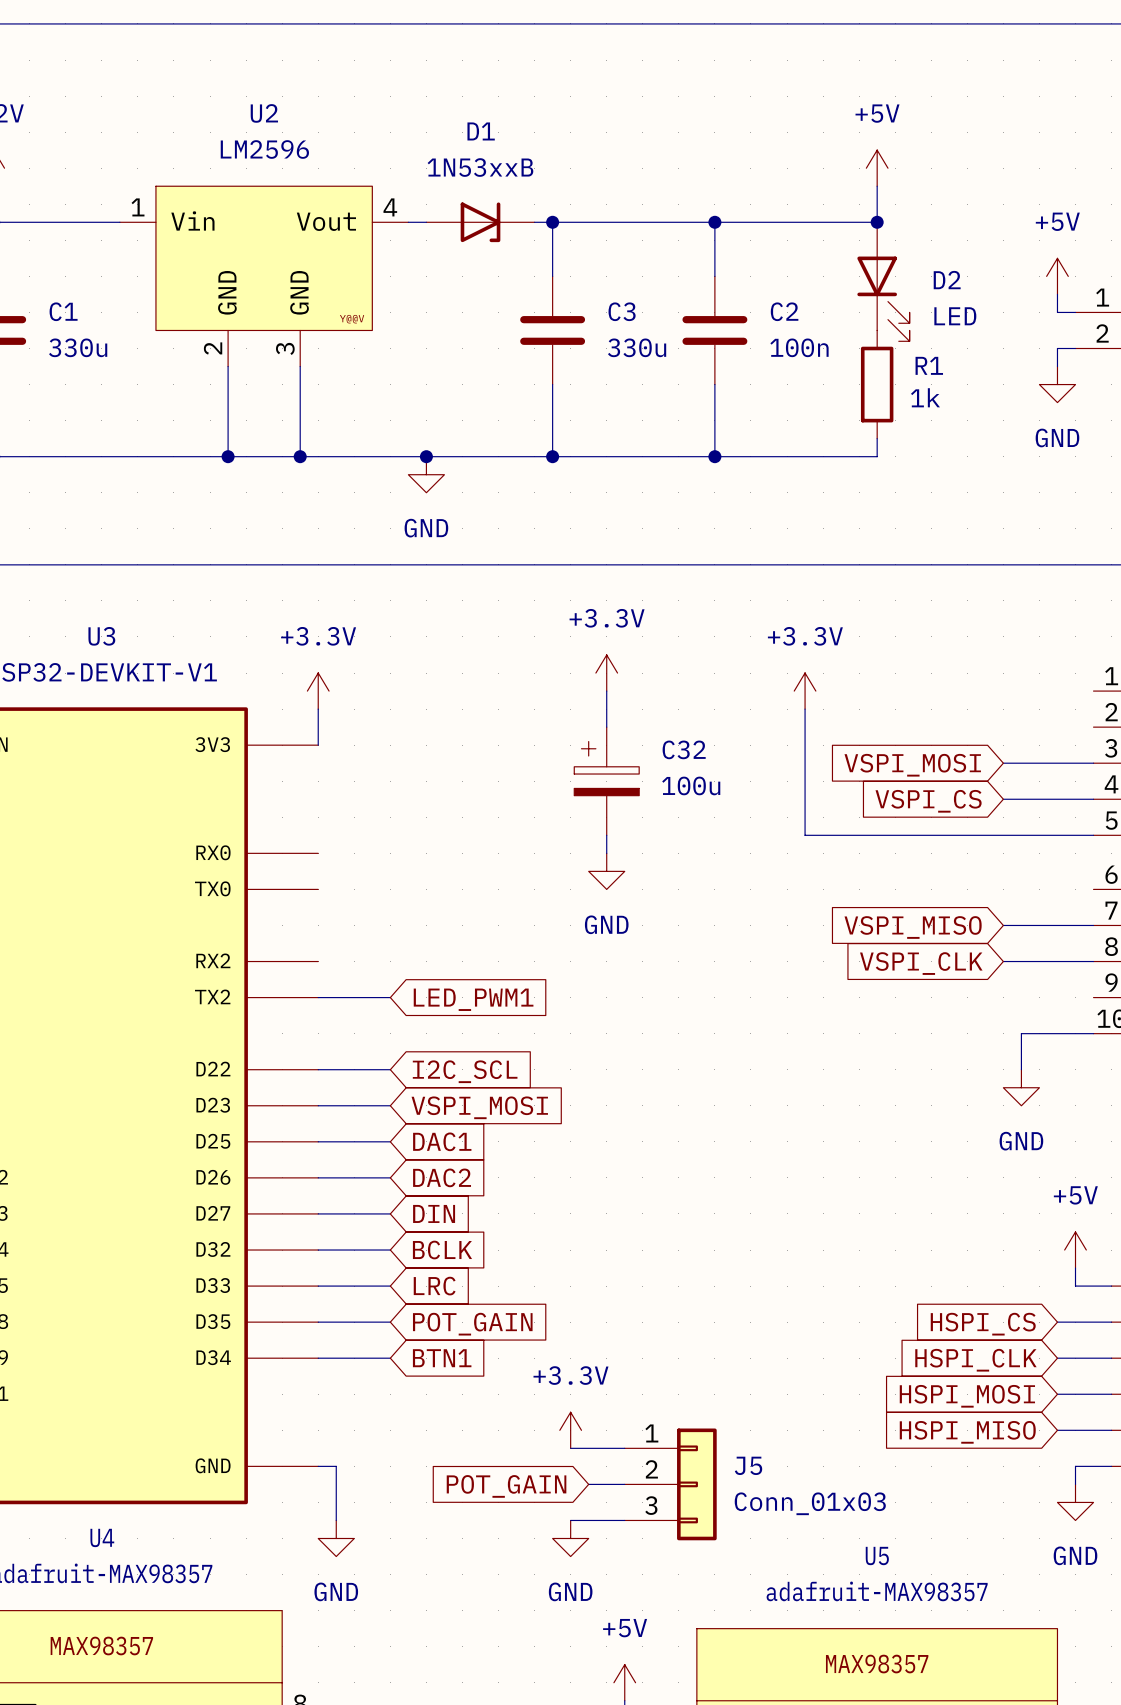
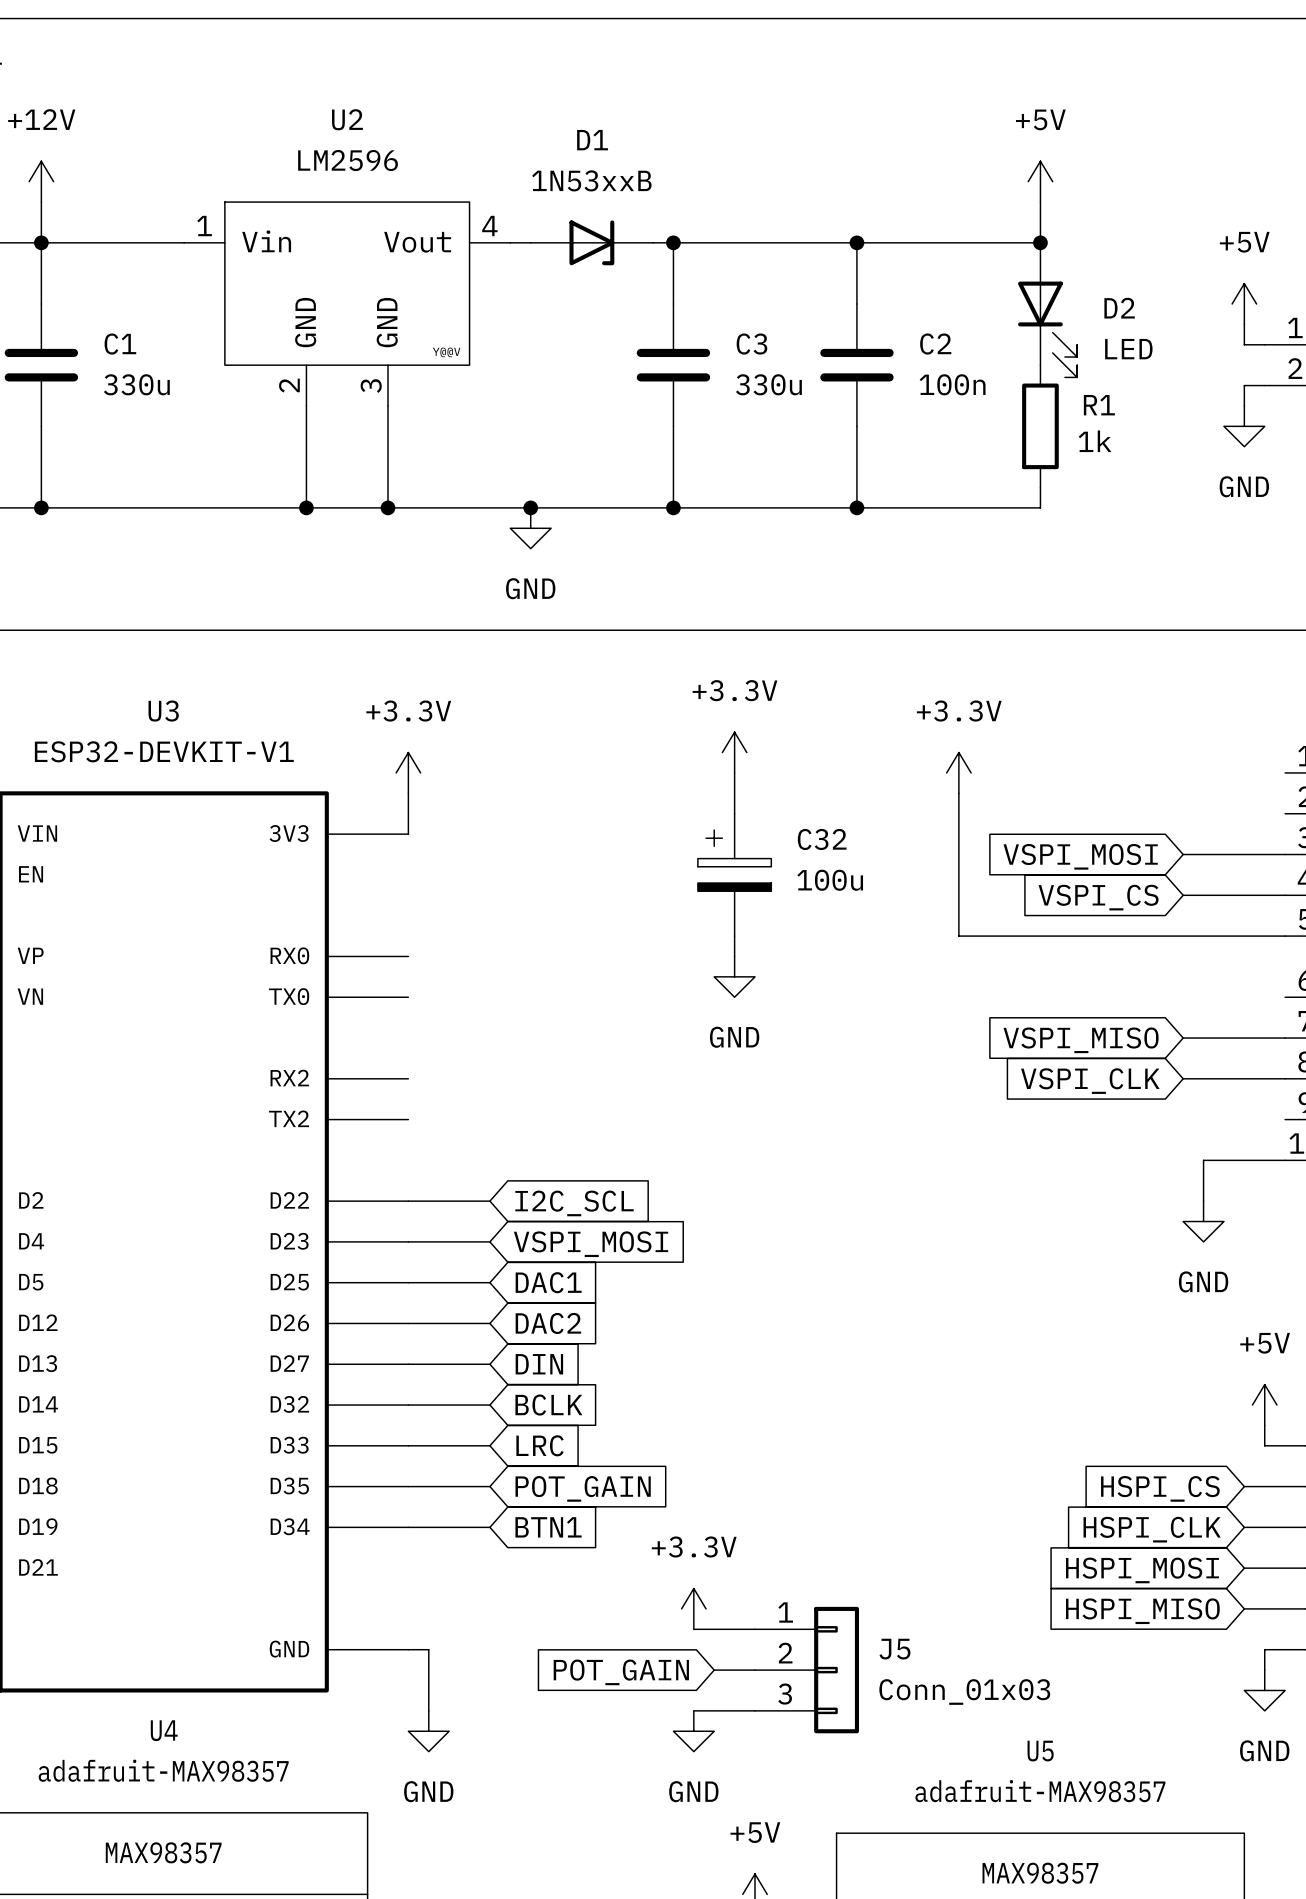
wire: (318, 997) (390, 997) -> none
global label: LED_PWM1 (473, 999) -> none

